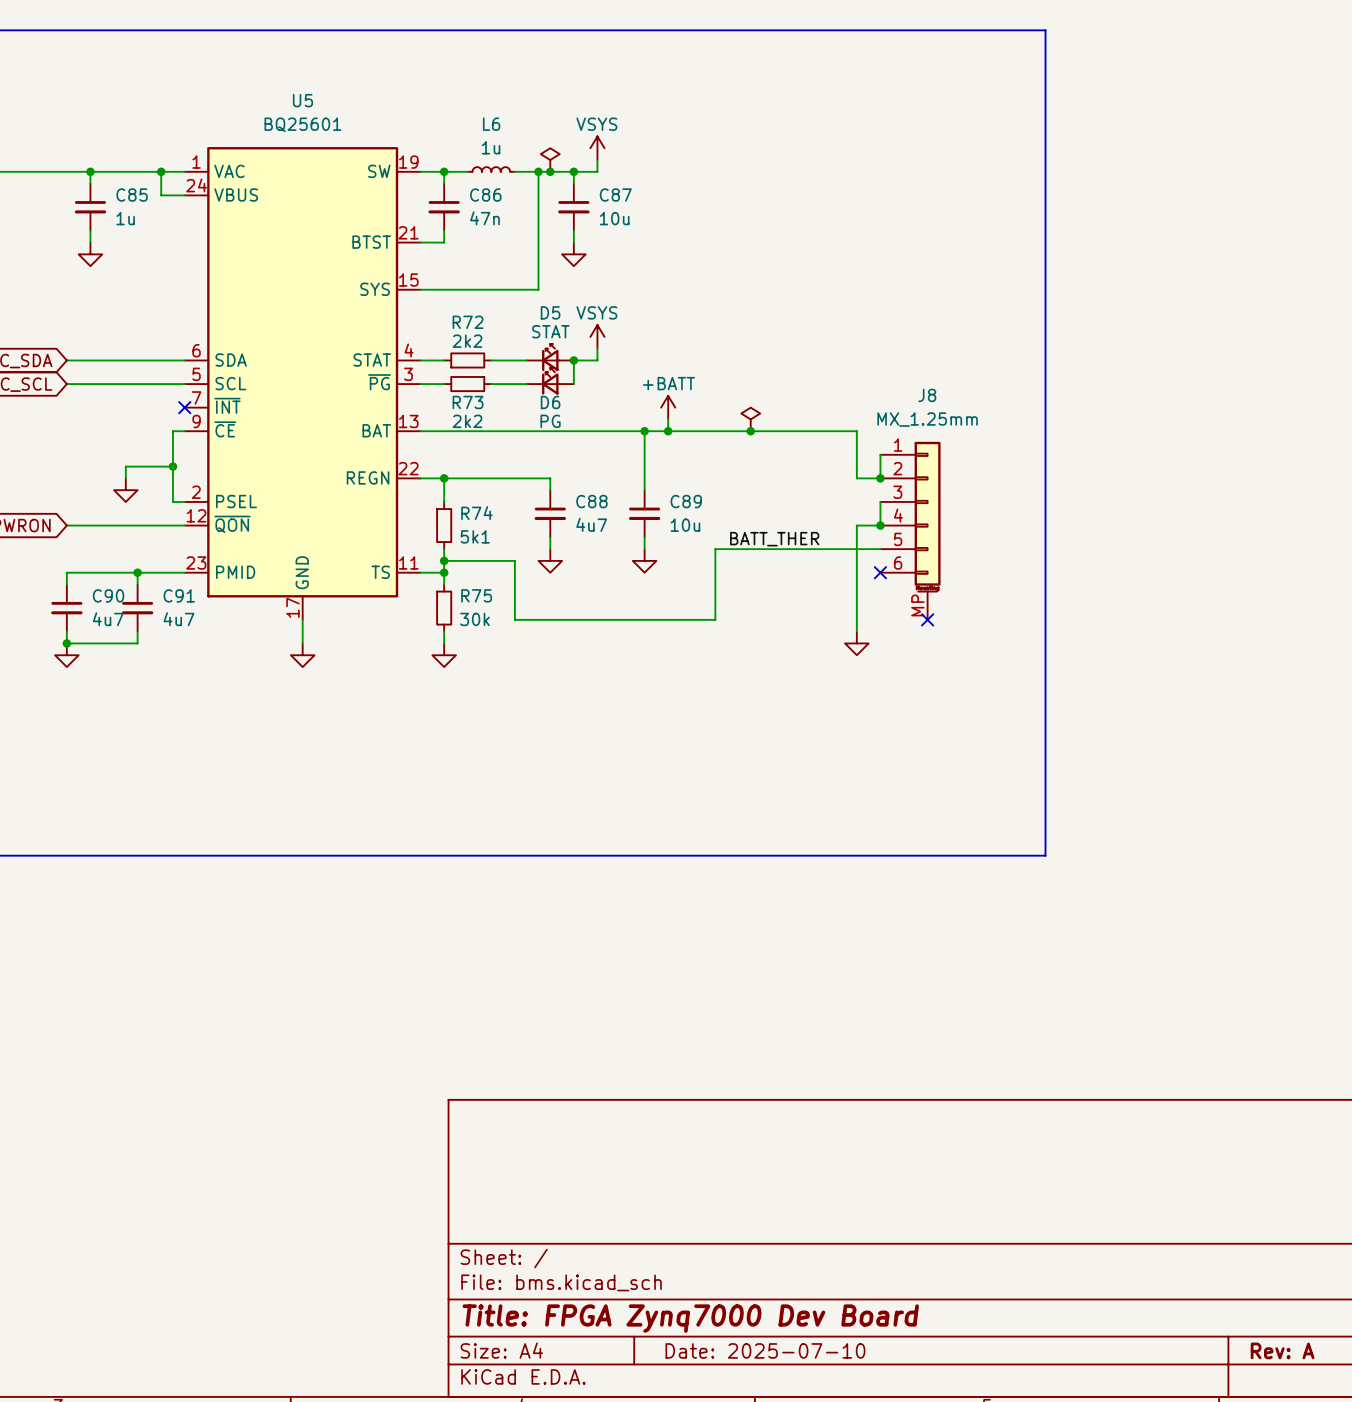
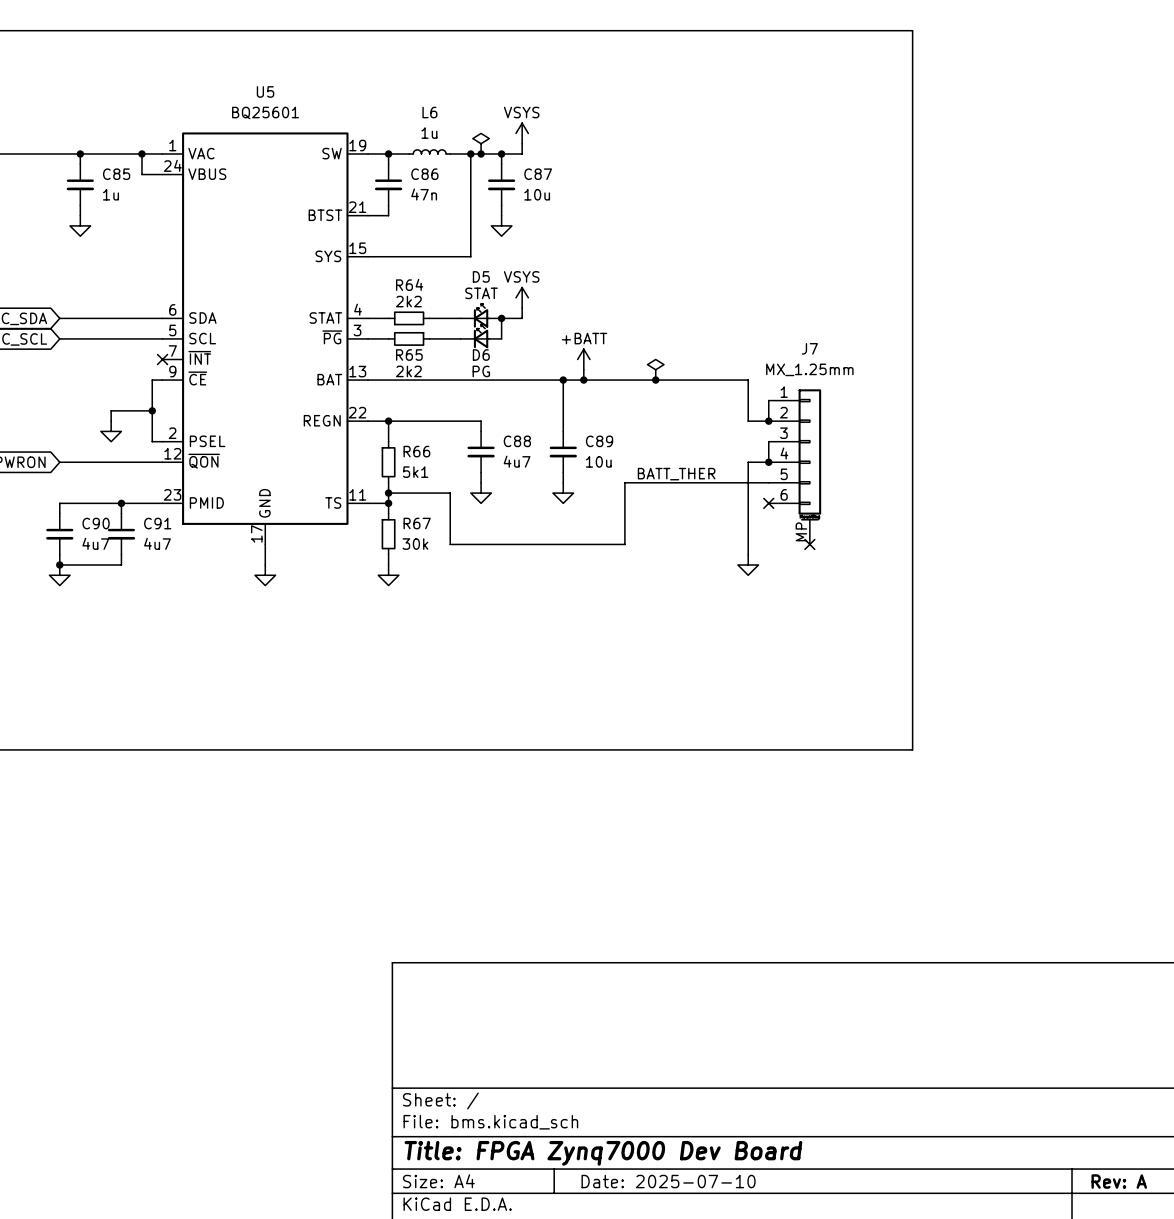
R72 name: R72 (468, 322) -> R64 (409, 284)
J8 name: J8 (927, 395) -> J7 (809, 348)
R73 name: R73 (468, 402) -> R65 (409, 355)
R74 name: R74 (476, 513) -> R66 (416, 451)
R75 name: R75 (476, 595) -> R67 (417, 523)

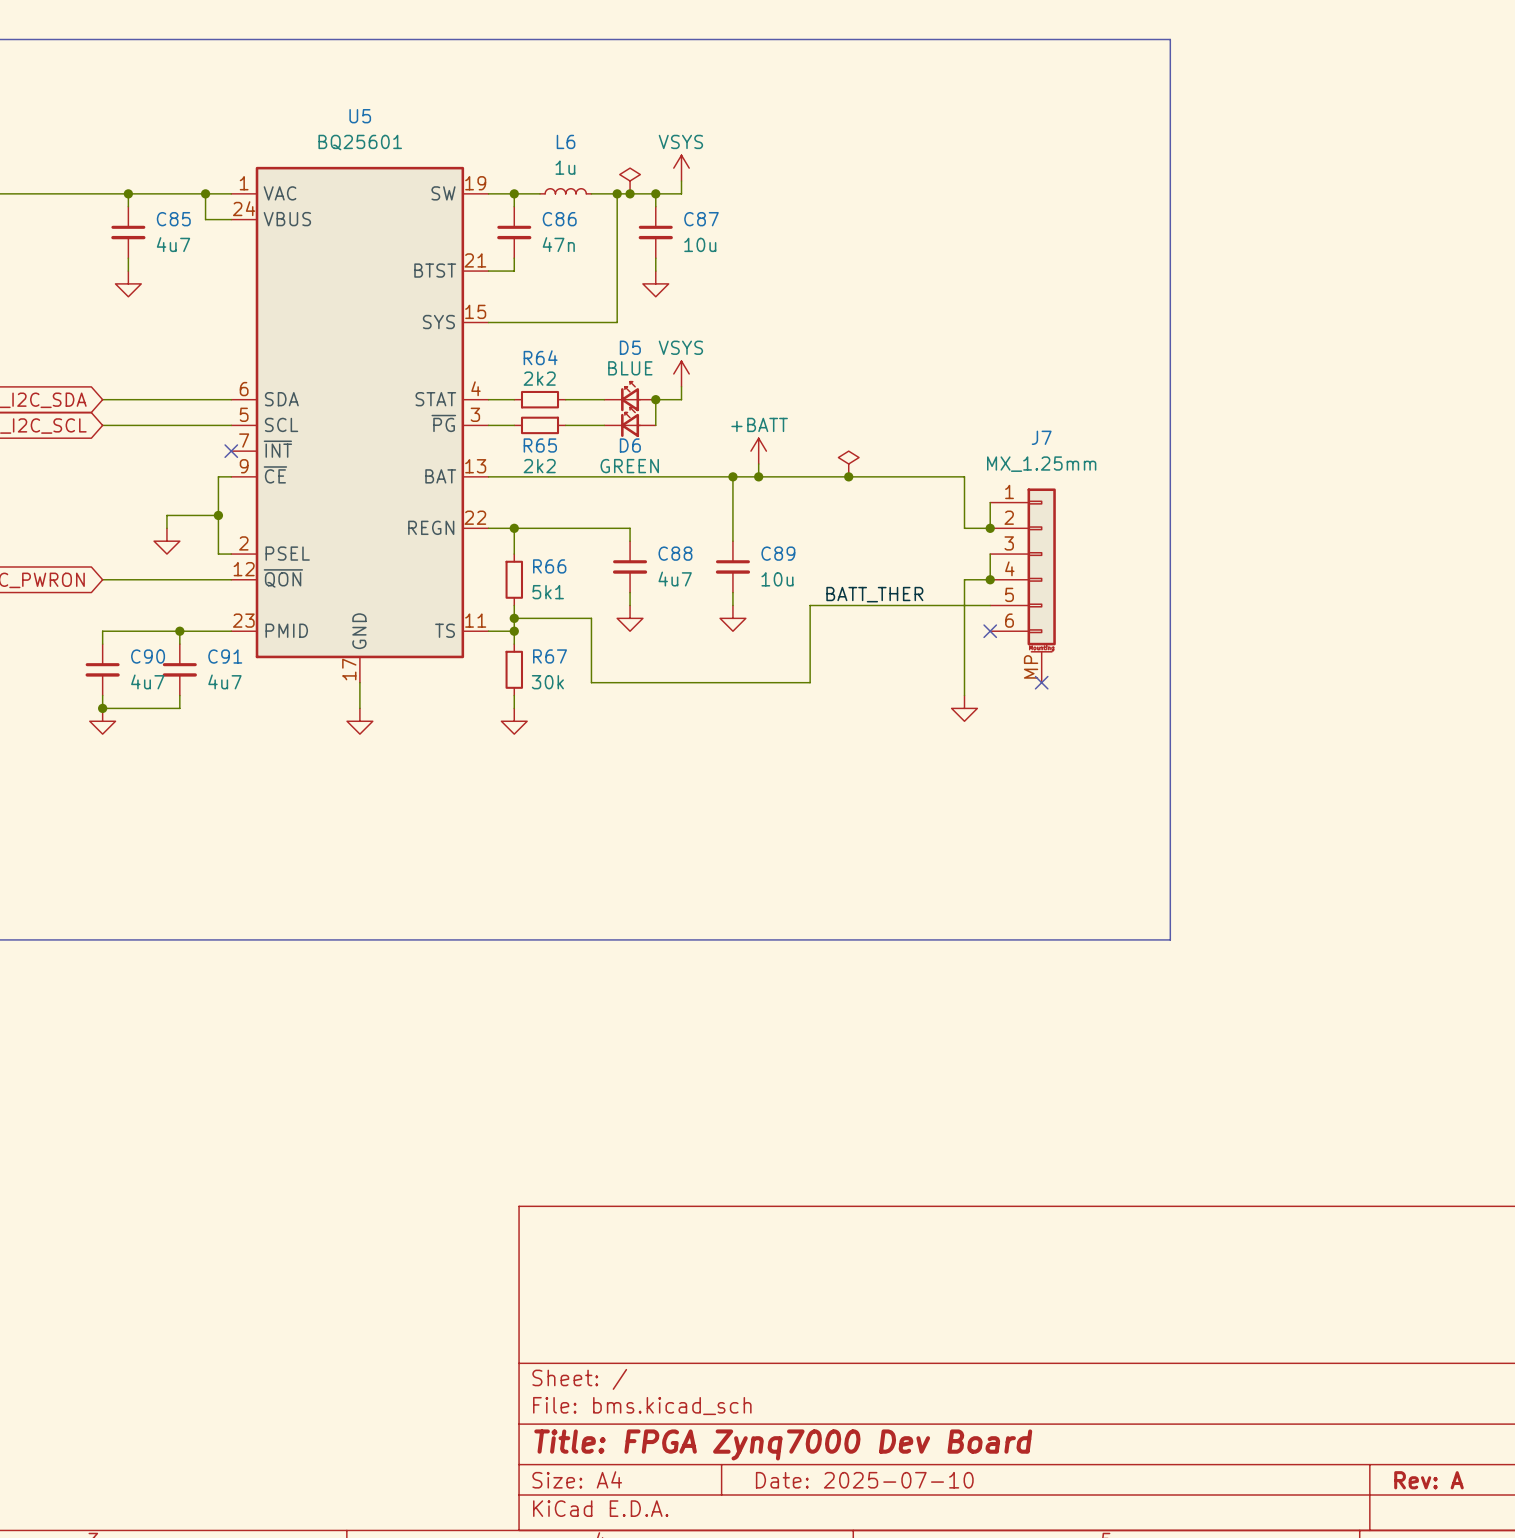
C85 value: 1u (110, 194) -> 4u7 (173, 244)
D5 value: STAT (481, 293) -> BLUE (630, 368)
D6 value: PG (481, 371) -> GREEN (629, 466)

